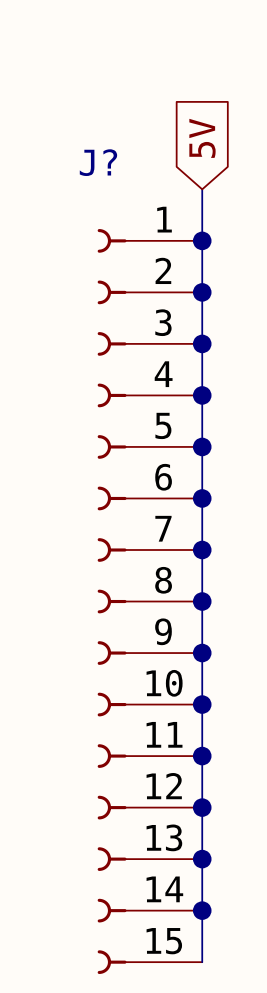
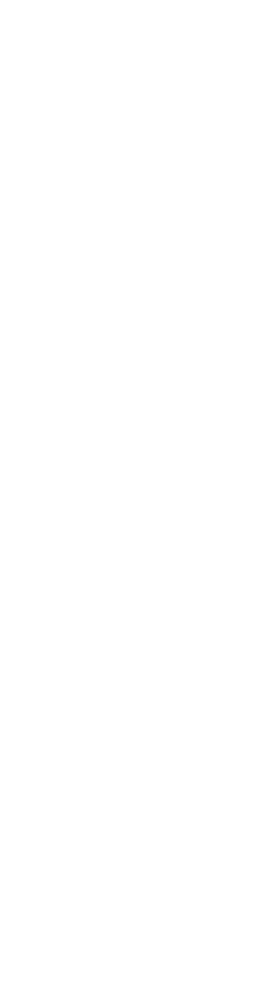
global label: 5V (202, 138) -> none
wire: (202, 189) (202, 962) -> none
junction: (202, 240) -> none
junction: (202, 292) -> none
junction: (202, 343) -> none
junction: (202, 395) -> none
junction: (202, 446) -> none
junction: (202, 498) -> none
junction: (202, 549) -> none
J?: (149, 601) -> none
junction: (202, 601) -> none
junction: (202, 653) -> none
junction: (202, 704) -> none
junction: (202, 756) -> none
junction: (202, 807) -> none
junction: (202, 859) -> none
junction: (202, 910) -> none

